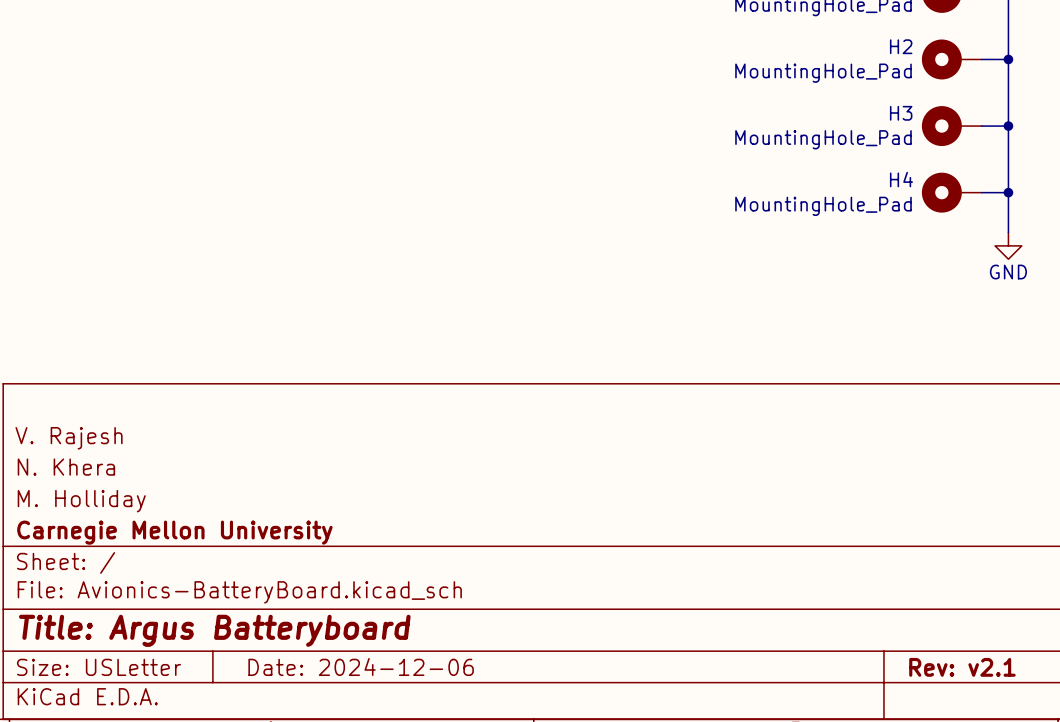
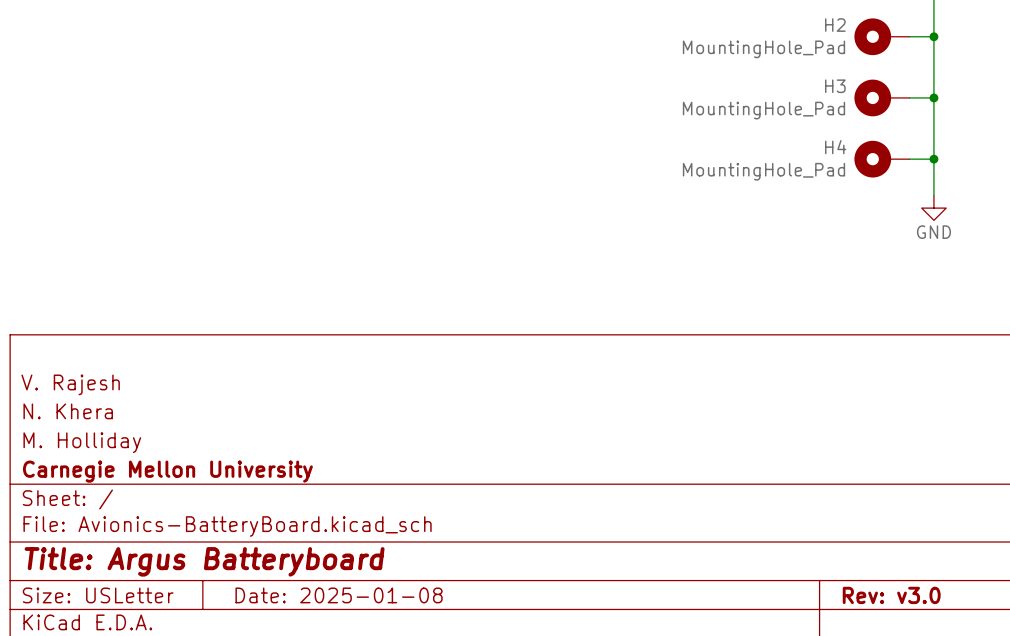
title block: Date: 2024-12-06 (361, 666) -> Date: 2025-01-08 (339, 595)
title block: Rev: v2.1 (962, 667) -> Rev: v3.0 (891, 595)

